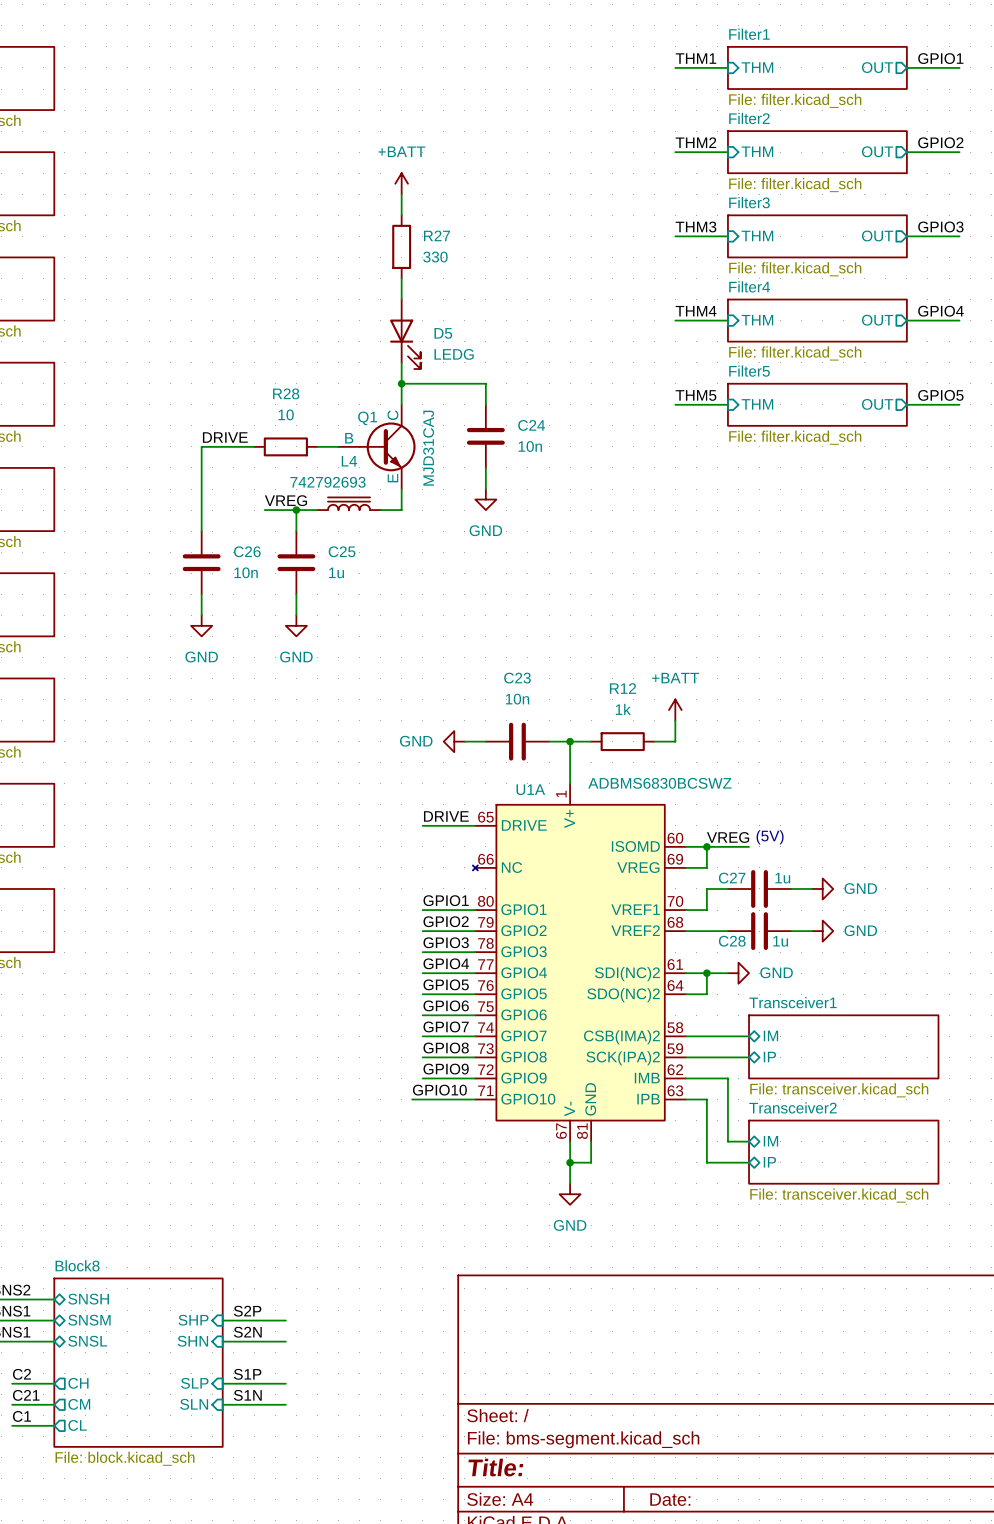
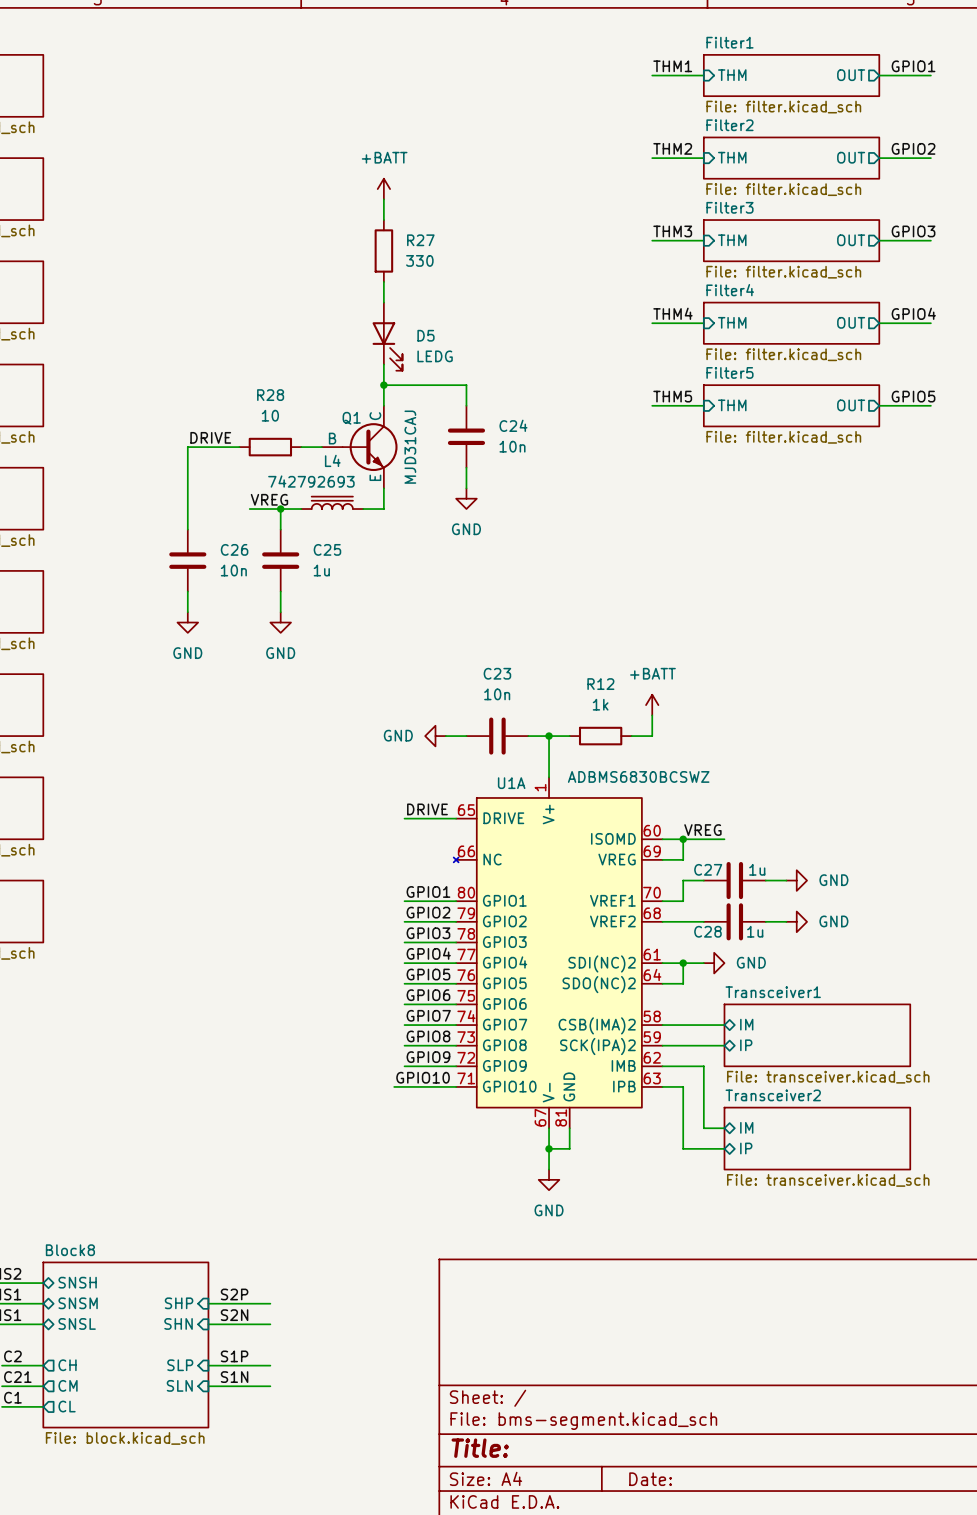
text: (5V) (770, 837) -> none

